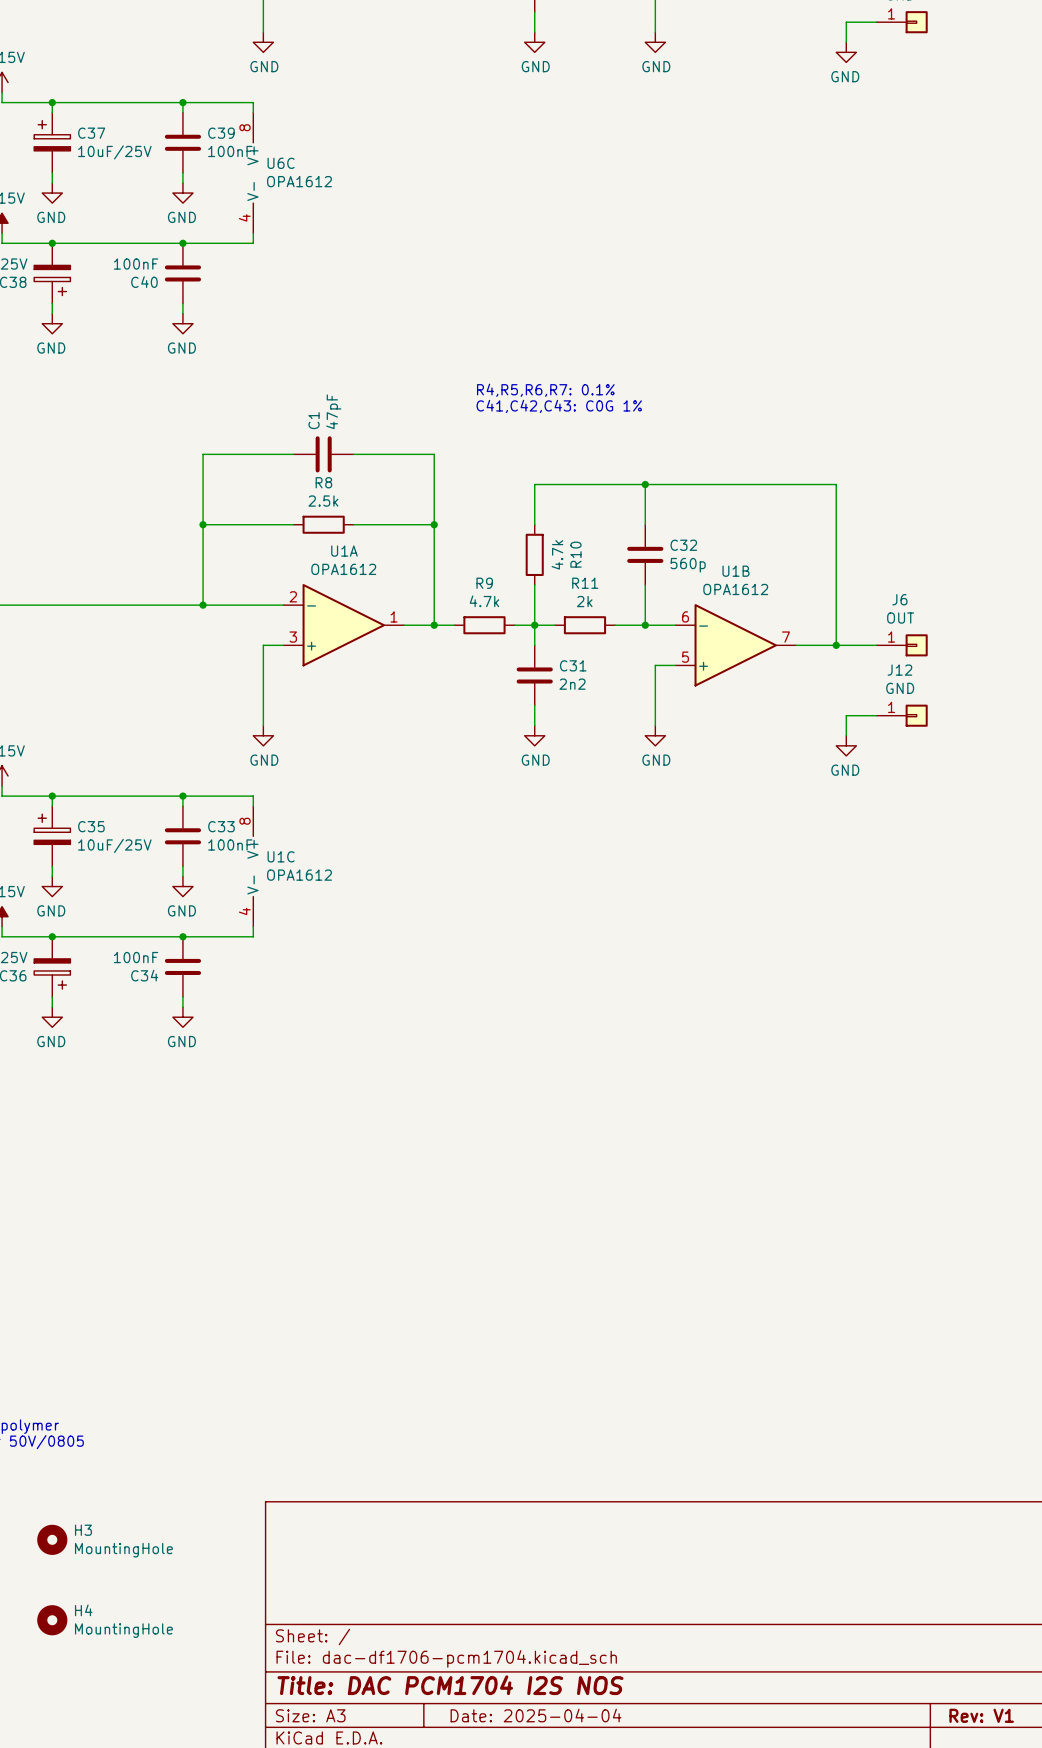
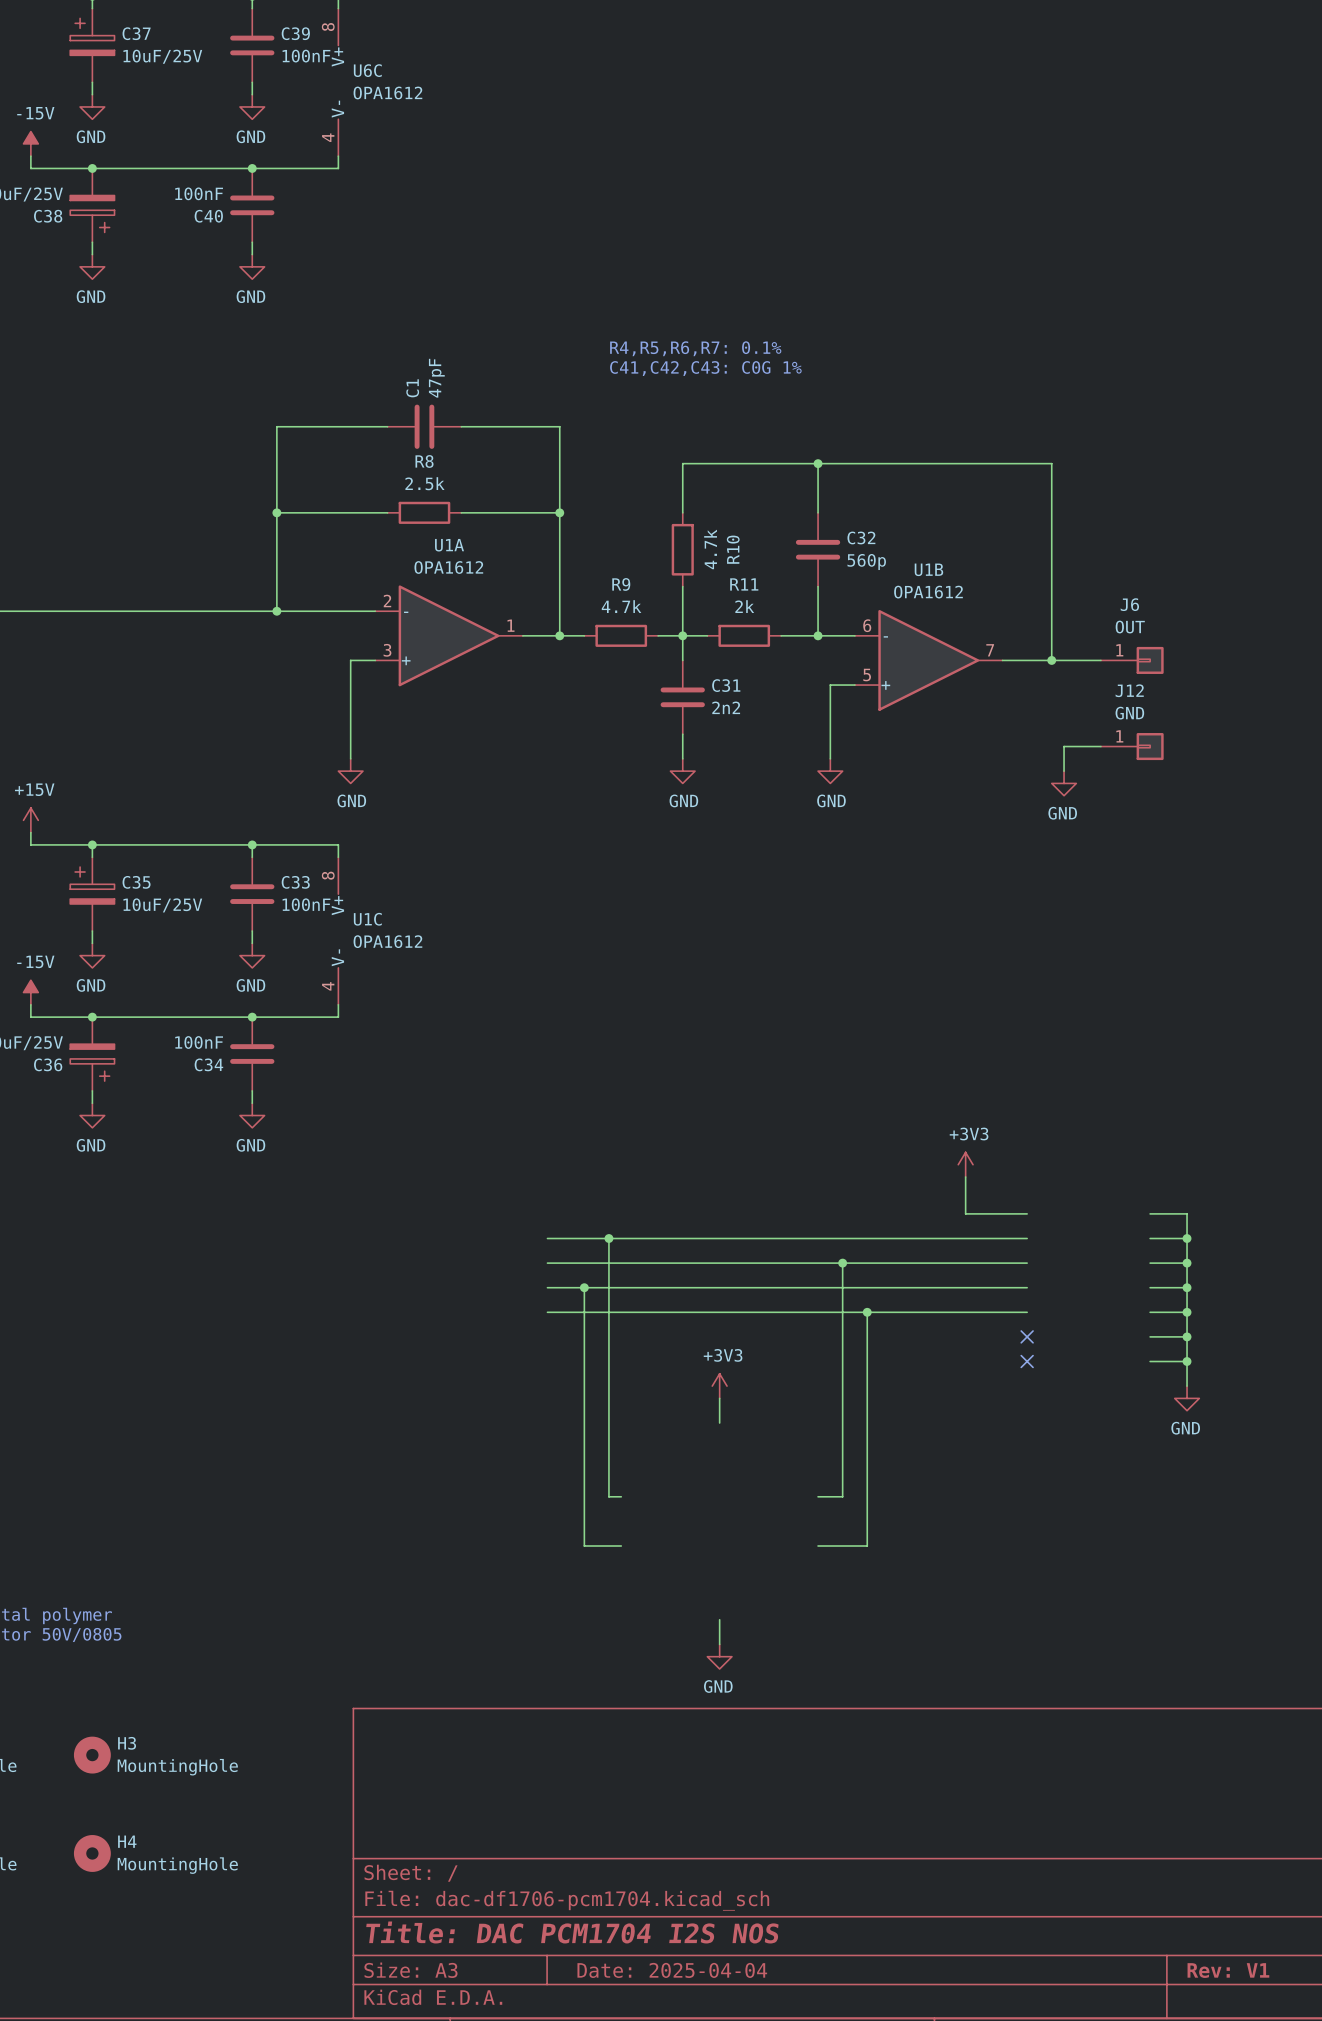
power symbol: none -> +3V3 (965, 1164)
wire: none -> (965, 1177) (965, 1213) (1027, 1213)
wire: none -> (1150, 1213) (1187, 1213) (1187, 1386)
wire: none -> (547, 1238) (1027, 1238)
wire: none -> (608, 1238) (608, 1496) (621, 1496)
junction: none -> (608, 1238)
wire: none -> (1150, 1238) (1187, 1238)
junction: none -> (1187, 1238)
wire: none -> (547, 1263) (1027, 1263)
wire: none -> (842, 1263) (842, 1496) (818, 1496)
junction: none -> (842, 1263)
wire: none -> (1150, 1263) (1187, 1263)
junction: none -> (1187, 1263)
wire: none -> (547, 1287) (1027, 1287)
wire: none -> (584, 1287) (584, 1545) (621, 1545)
junction: none -> (584, 1287)
wire: none -> (1150, 1287) (1187, 1287)
junction: none -> (1187, 1287)
wire: none -> (547, 1312) (1027, 1312)
wire: none -> (867, 1312) (867, 1545) (818, 1545)
junction: none -> (867, 1312)
wire: none -> (1150, 1312) (1187, 1312)
junction: none -> (1187, 1312)
no-connect mark: none -> (1027, 1336)
wire: none -> (1150, 1336) (1187, 1336)
junction: none -> (1187, 1336)
no-connect mark: none -> (1027, 1361)
wire: none -> (1150, 1361) (1187, 1361)
junction: none -> (1187, 1361)
power symbol: none -> +3V3 (719, 1386)
wire: none -> (719, 1398) (719, 1423)
power symbol: none -> GND (1187, 1398)
wire: none -> (719, 1619) (719, 1644)
power symbol: none -> GND (719, 1656)

